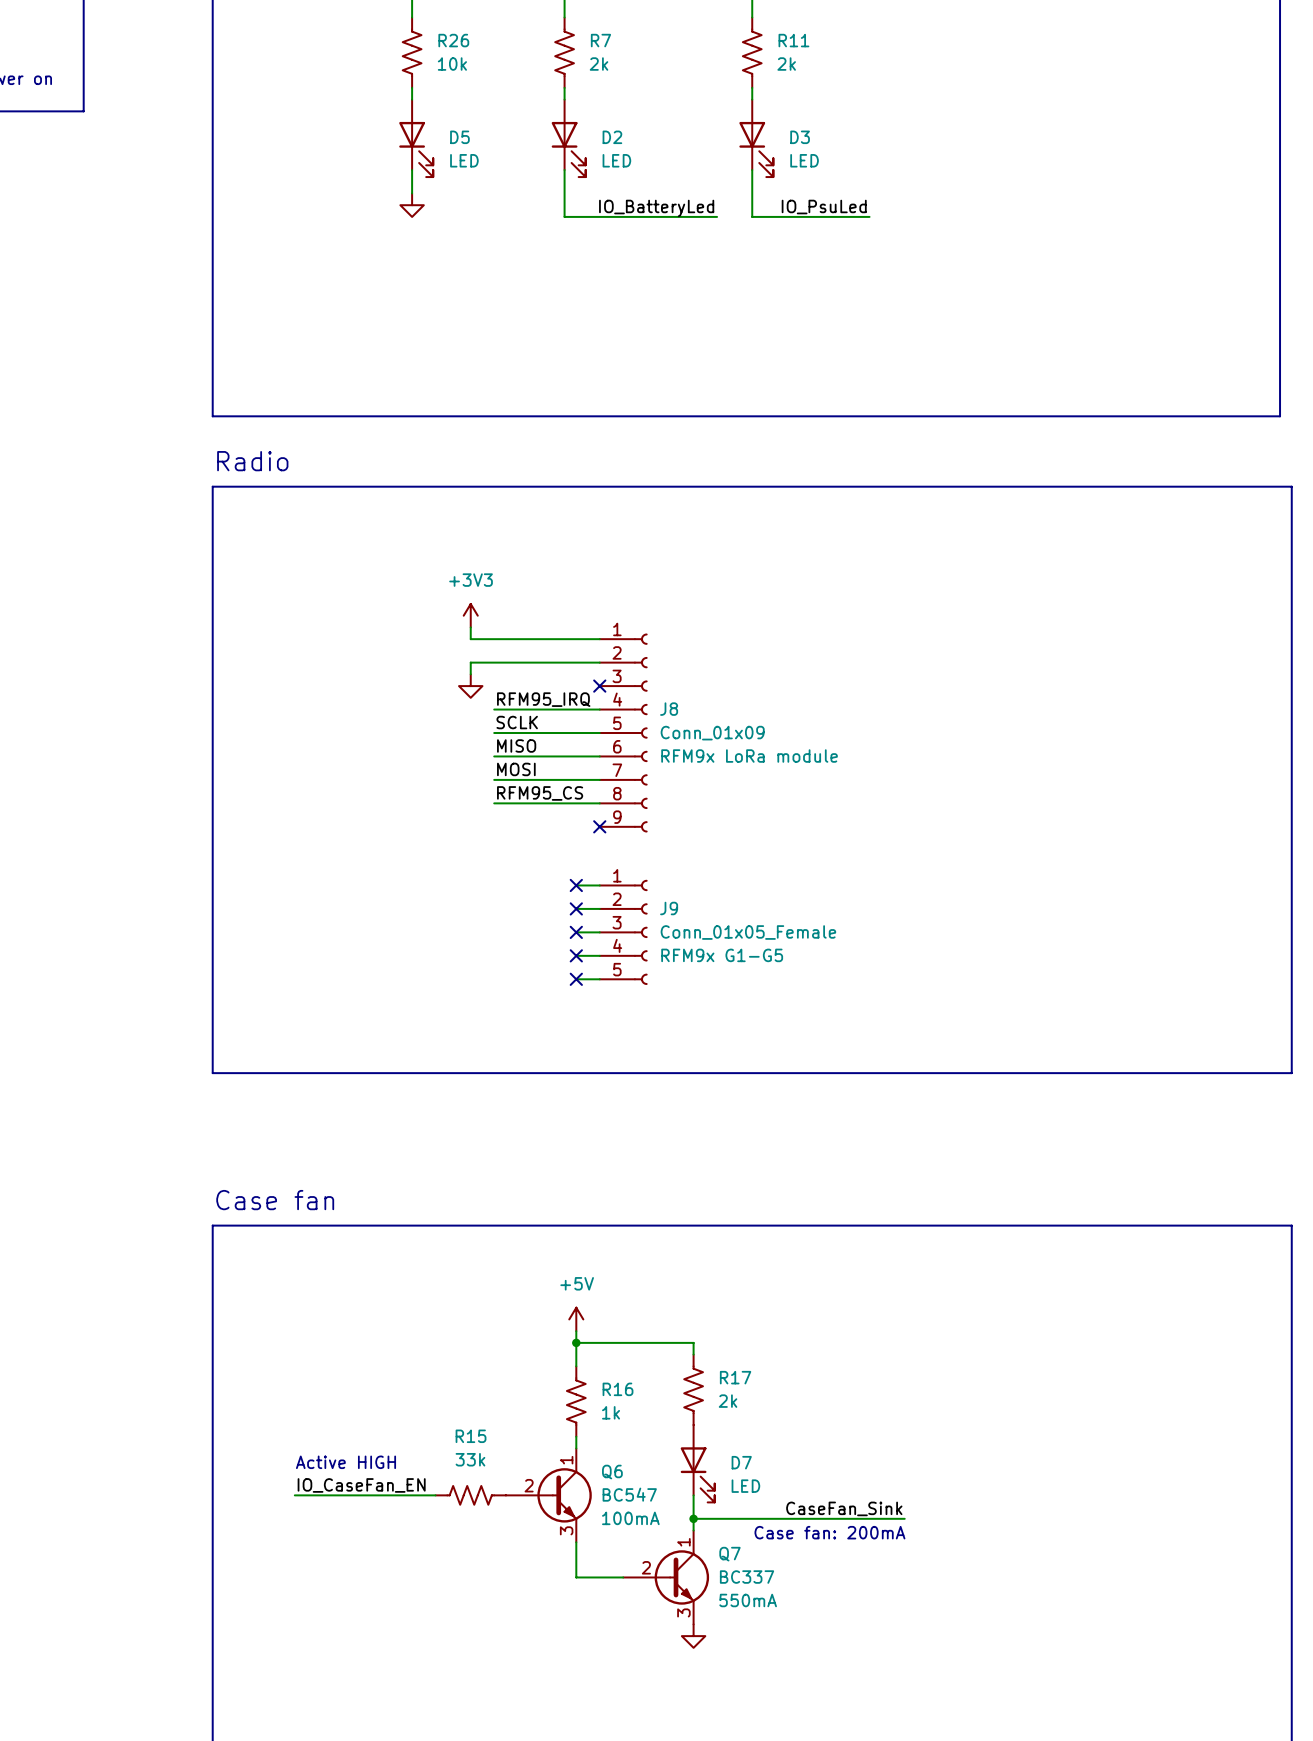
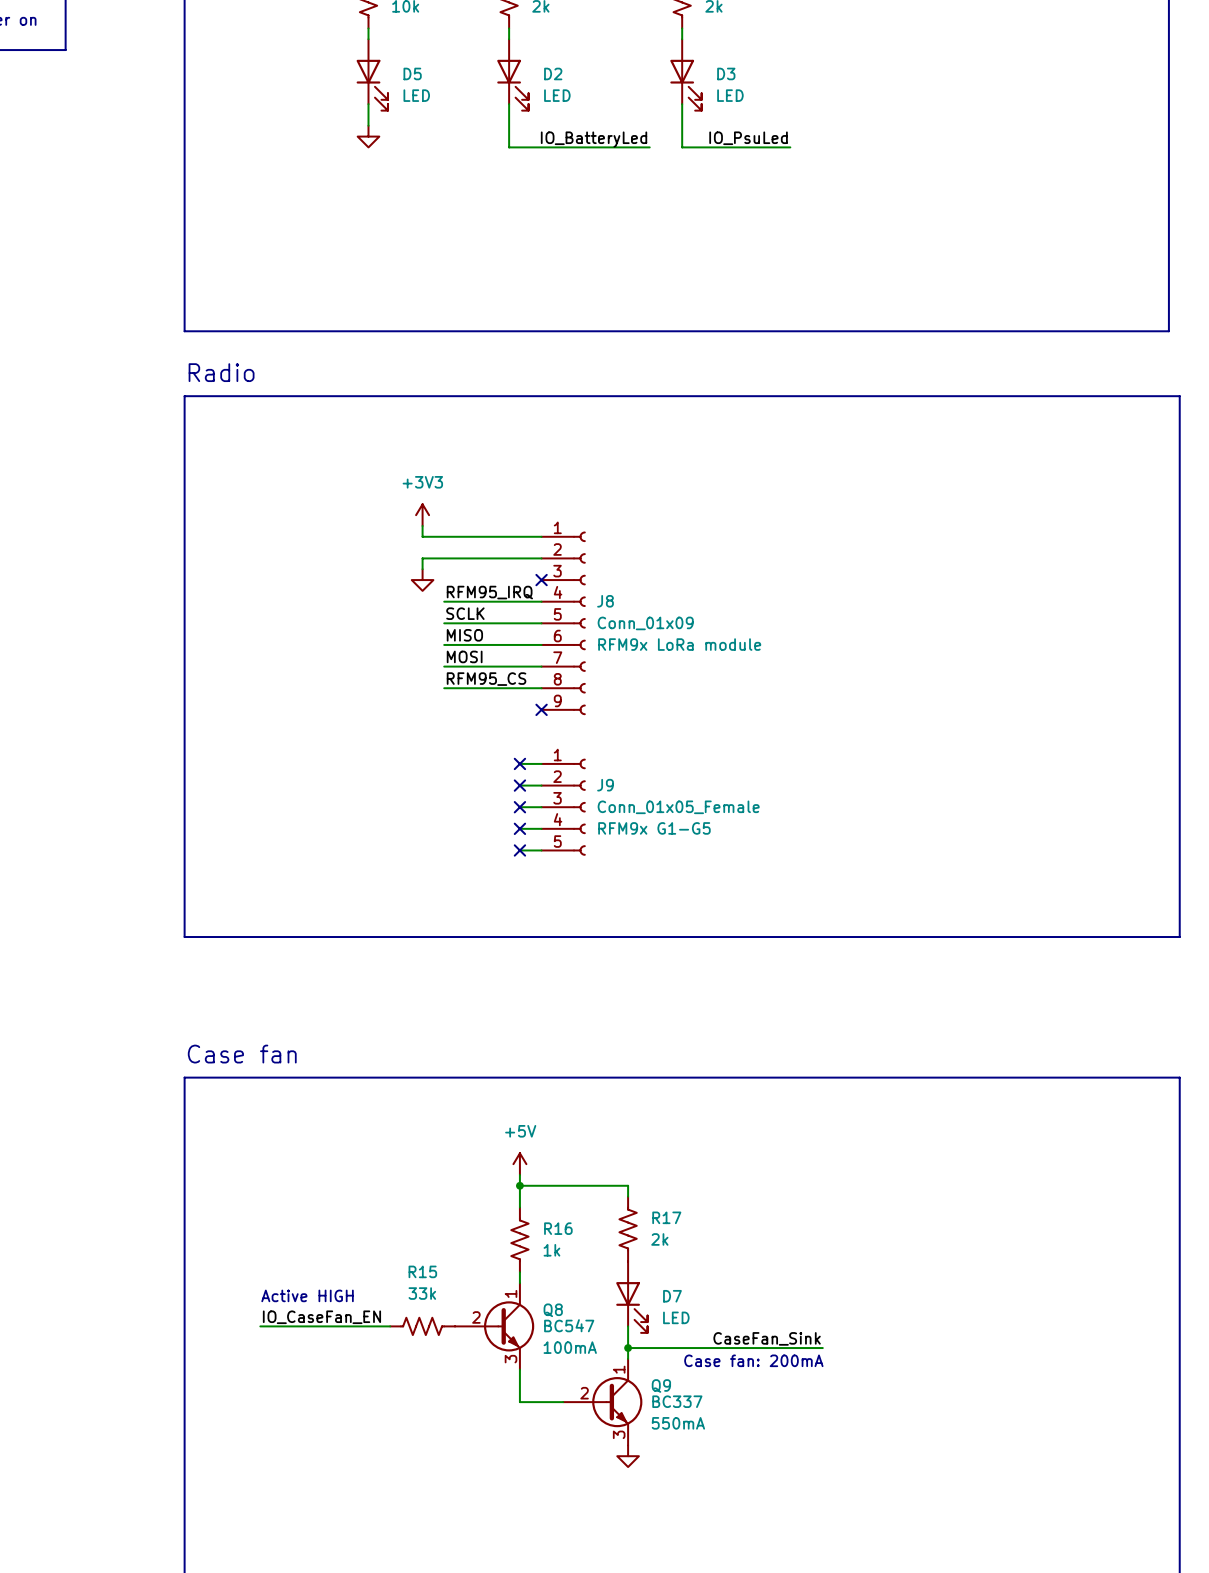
Q6 name: Q6 (612, 1472) -> Q8 (553, 1310)
Q7 name: Q7 (729, 1554) -> Q9 (661, 1386)

